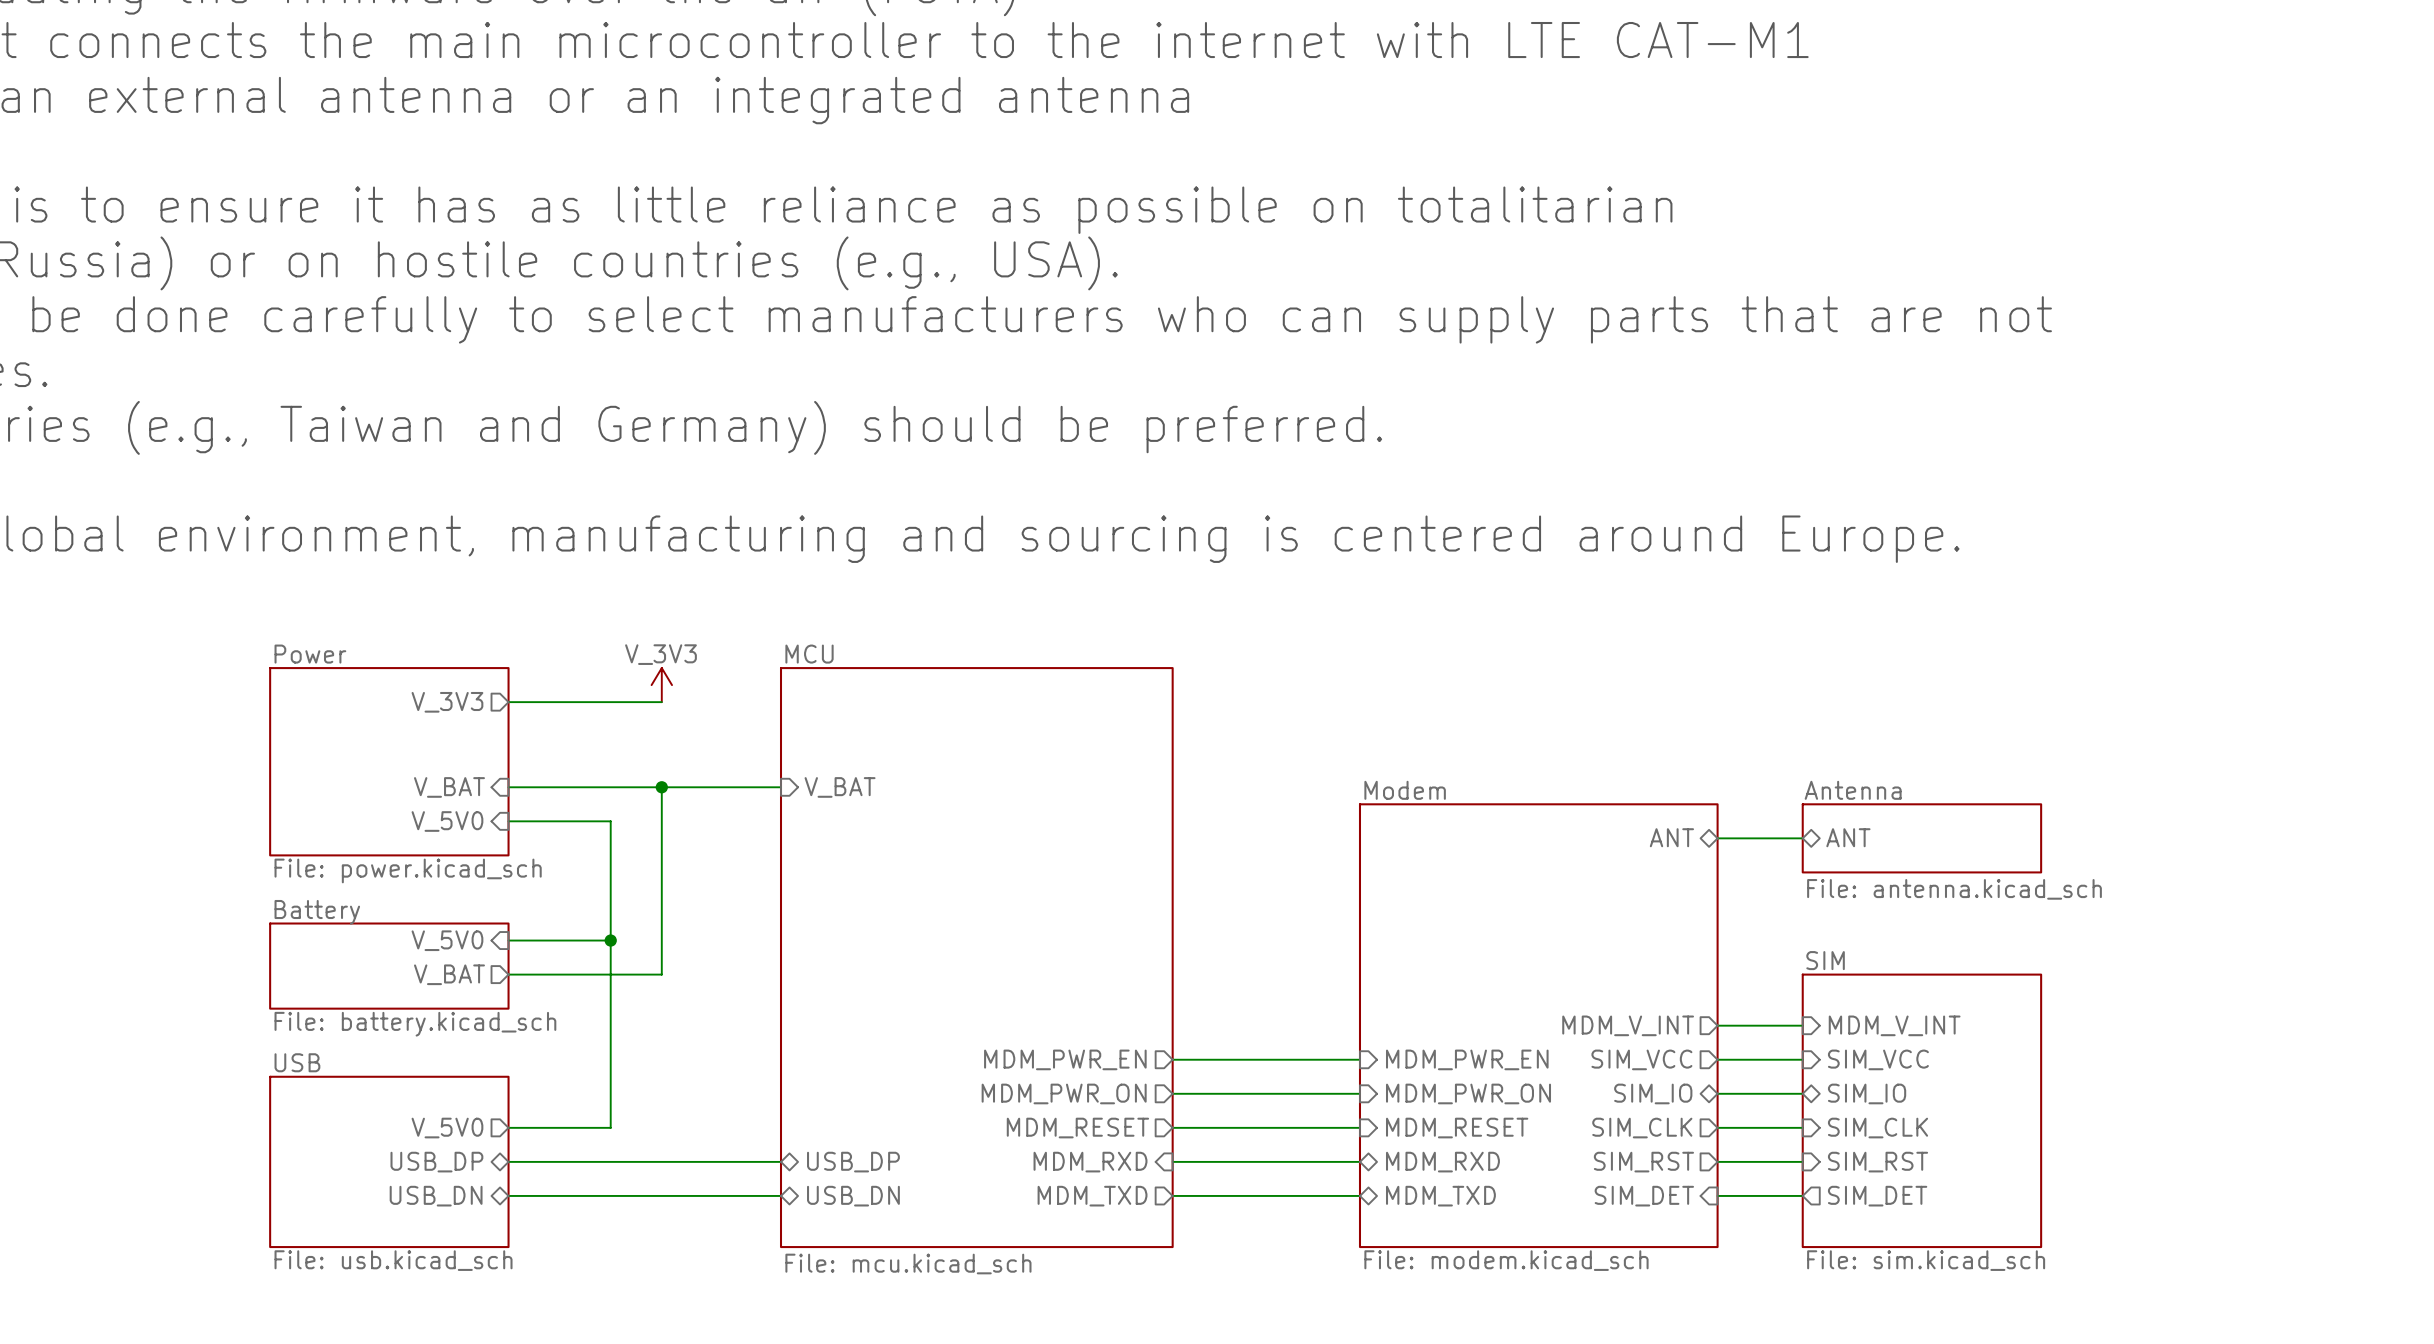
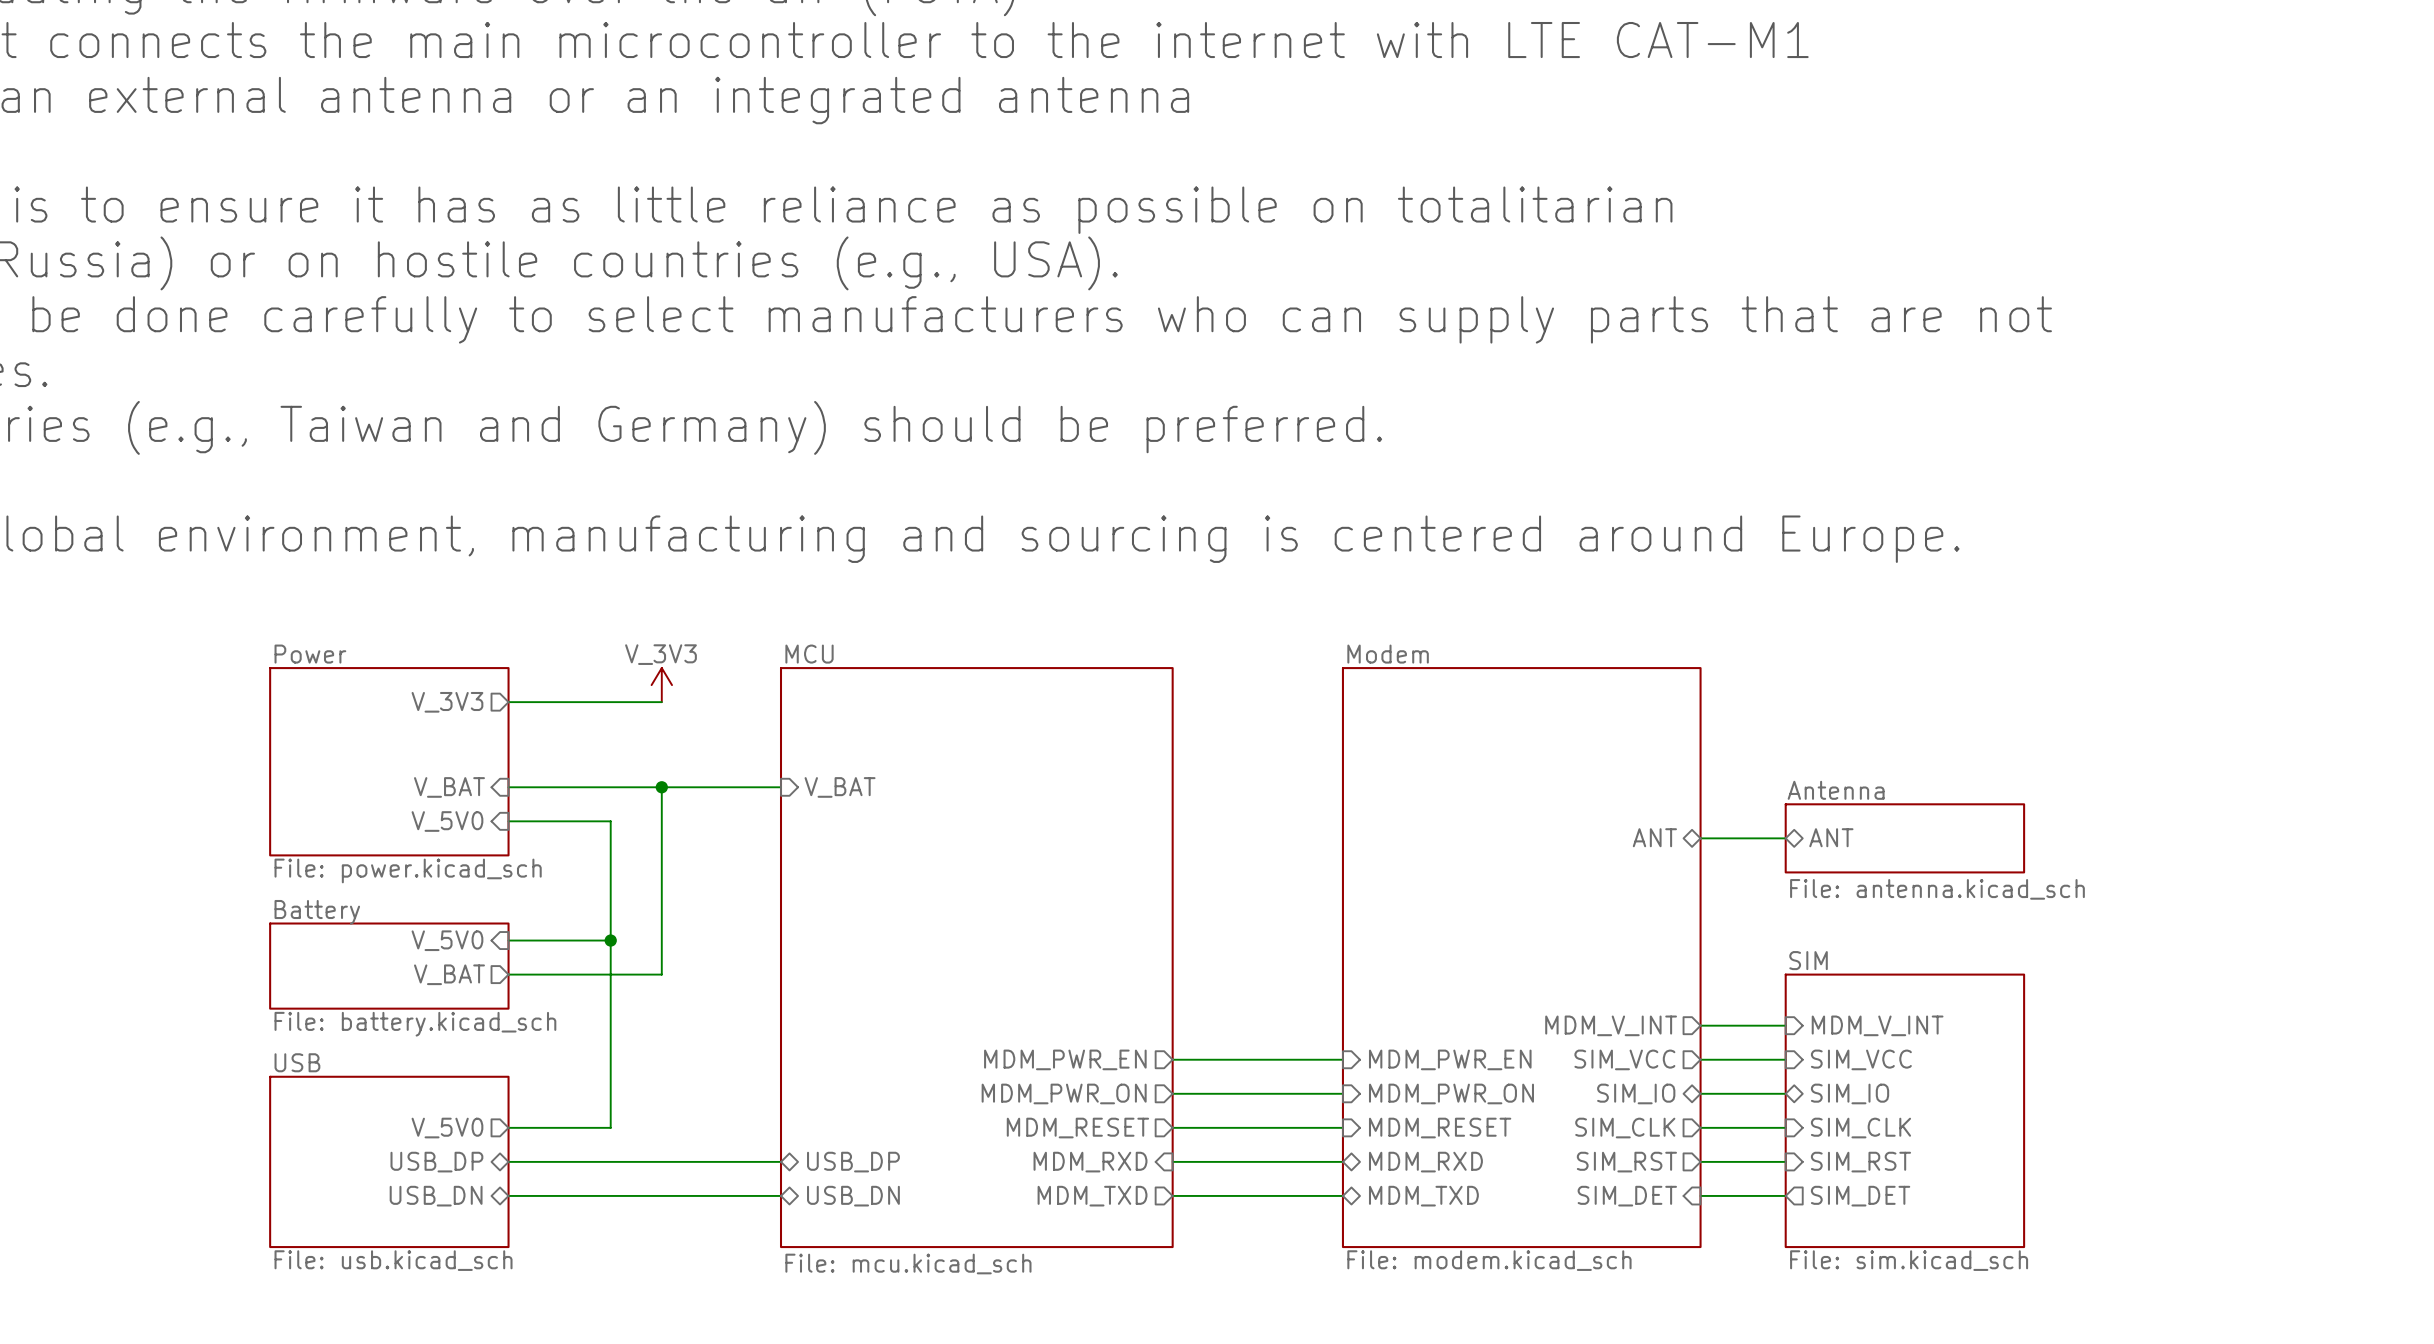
sheet pin position: ANT (1671, 837) -> ANT (1654, 837)
sheet pin position: ANT (1848, 837) -> ANT (1831, 837)
wire: (1785, 838) (1802, 838) -> (1700, 838) (1717, 838)
sheet Antenna position: (1921, 838) -> (1904, 838)
sheet Modem: none -> File: modem.kicad_sch (1521, 957)
sheet Modem: File: modem.kicad_sch (1538, 1025) -> none
sheet pin position: MDM_V_INT (1628, 1025) -> MDM_V_INT (1611, 1025)
wire: (1785, 1025) (1802, 1025) -> (1700, 1025) (1717, 1025)
sheet pin position: MDM_V_INT (1894, 1025) -> MDM_V_INT (1877, 1025)
wire: (1342, 1059) (1359, 1059) -> none
sheet pin position: MDM_PWR_EN (1467, 1059) -> MDM_PWR_EN (1450, 1059)
sheet pin position: SIM_VCC (1641, 1059) -> SIM_VCC (1624, 1059)
wire: (1785, 1059) (1802, 1059) -> (1700, 1059) (1717, 1059)
sheet pin position: SIM_VCC (1878, 1059) -> SIM_VCC (1861, 1059)
wire: (1342, 1093) (1359, 1093) -> none
sheet pin position: MDM_PWR_ON (1468, 1093) -> MDM_PWR_ON (1451, 1093)
sheet pin position: SIM_IO (1653, 1093) -> SIM_IO (1636, 1093)
wire: (1785, 1093) (1802, 1093) -> (1700, 1093) (1717, 1093)
sheet pin position: SIM_IO (1867, 1093) -> SIM_IO (1850, 1093)
sheet SIM position: (1921, 1110) -> (1904, 1110)
wire: (1342, 1127) (1359, 1127) -> none
wire: (1785, 1127) (1802, 1127) -> (1700, 1127) (1717, 1127)
sheet pin position: MDM_RESET (1457, 1128) -> MDM_RESET (1440, 1128)
sheet pin position: SIM_CLK (1642, 1128) -> SIM_CLK (1625, 1128)
sheet pin position: SIM_CLK (1878, 1128) -> SIM_CLK (1860, 1128)
wire: (1342, 1161) (1359, 1161) -> none
wire: (1785, 1161) (1802, 1161) -> (1700, 1161) (1717, 1161)
sheet pin position: MDM_RXD (1442, 1162) -> MDM_RXD (1425, 1162)
sheet pin position: SIM_RST (1643, 1162) -> SIM_RST (1626, 1162)
sheet pin position: SIM_RST (1878, 1162) -> SIM_RST (1860, 1162)
wire: (1342, 1195) (1359, 1195) -> none
wire: (1785, 1195) (1802, 1195) -> (1700, 1195) (1717, 1195)
sheet pin position: MDM_TXD (1440, 1196) -> MDM_TXD (1423, 1196)
sheet pin position: SIM_DET (1644, 1196) -> SIM_DET (1627, 1196)
sheet pin position: SIM_DET (1877, 1196) -> SIM_DET (1860, 1196)

